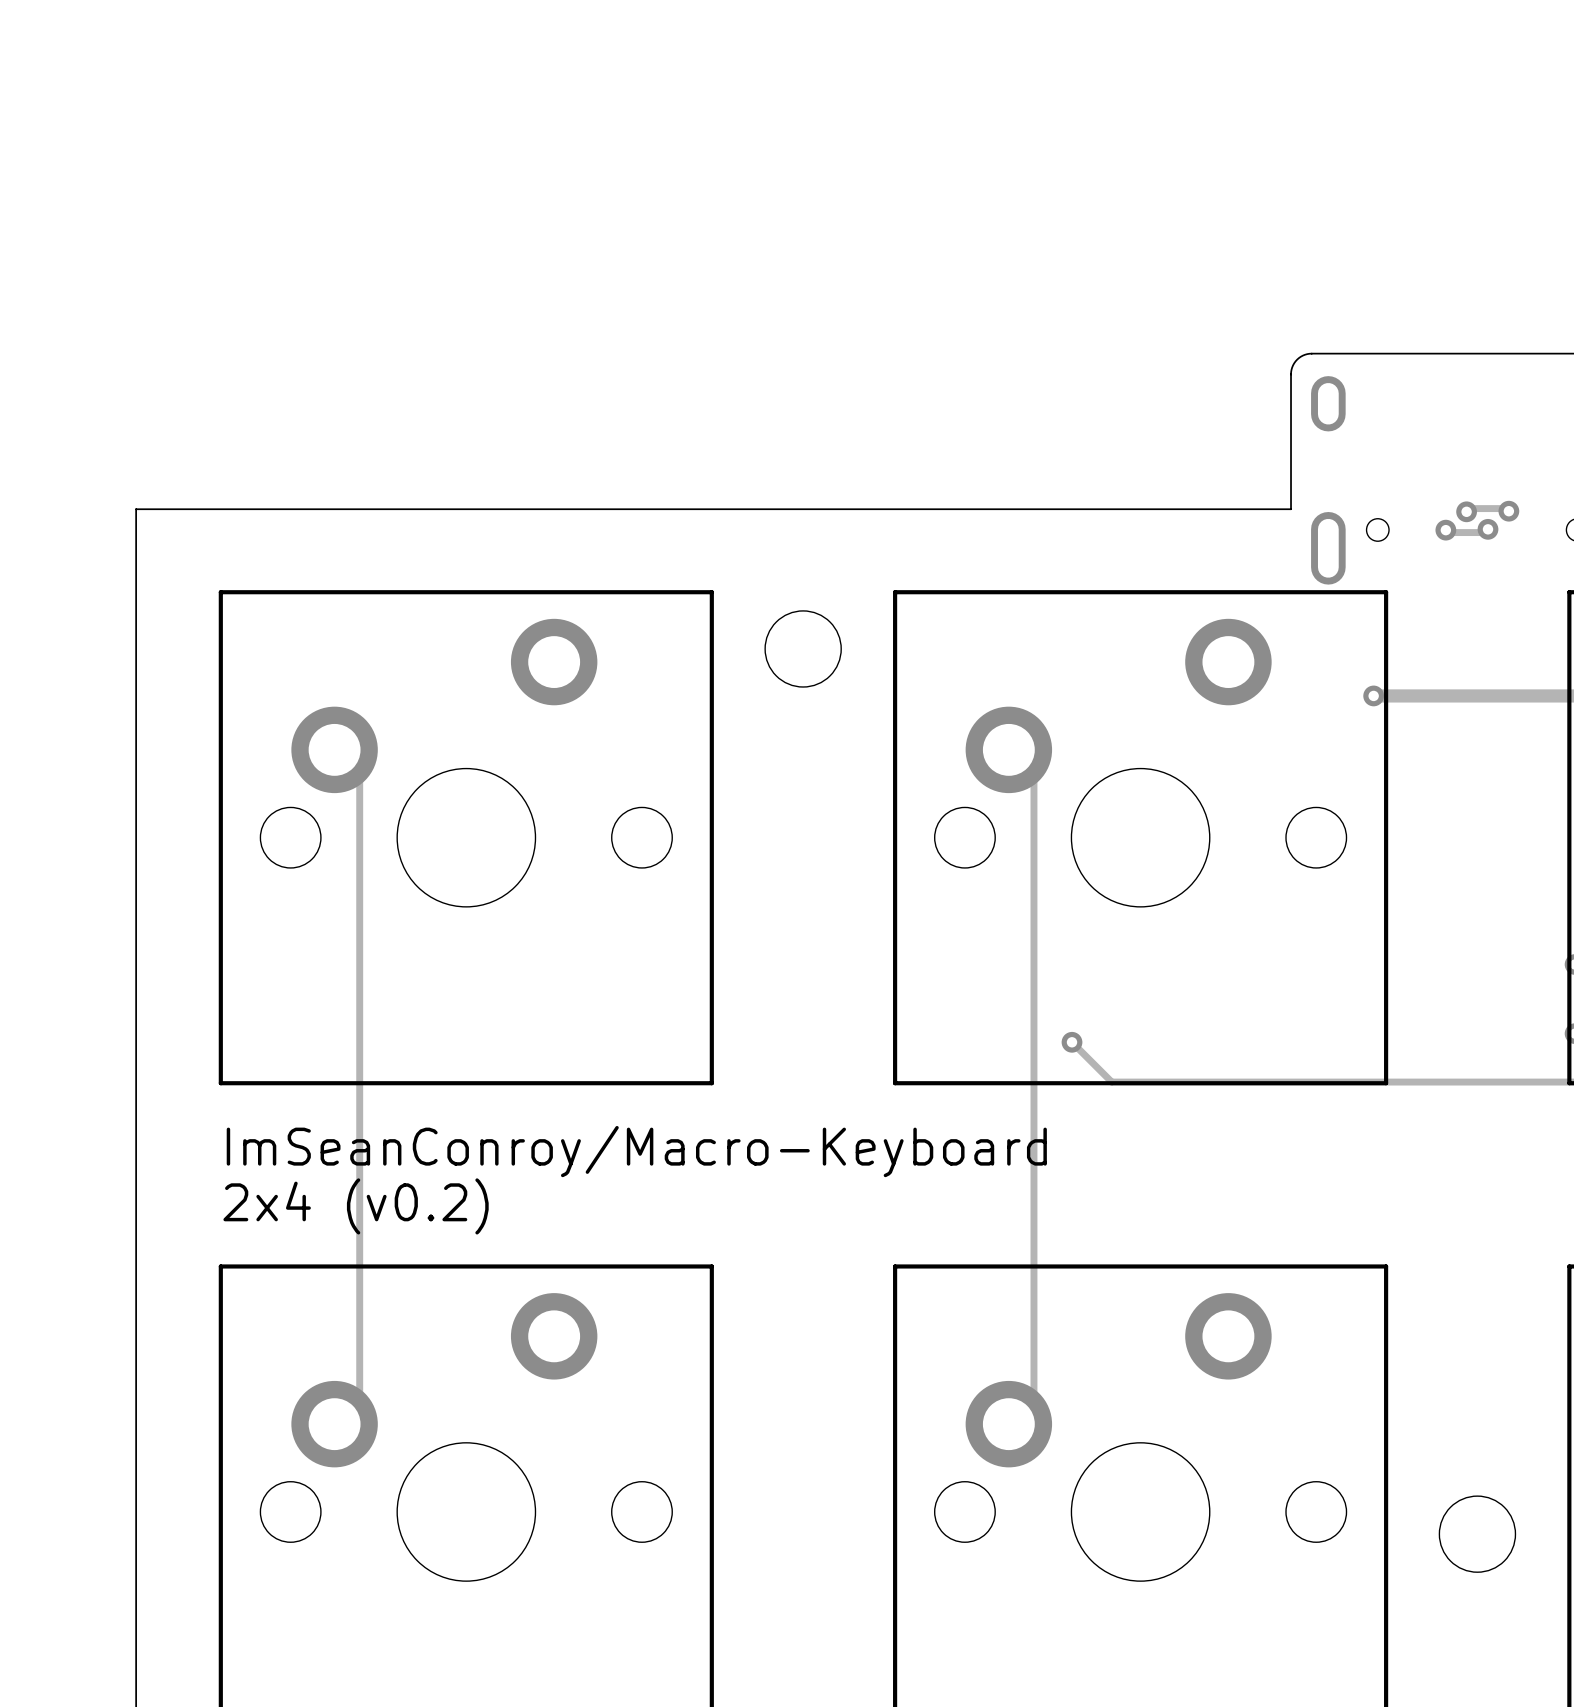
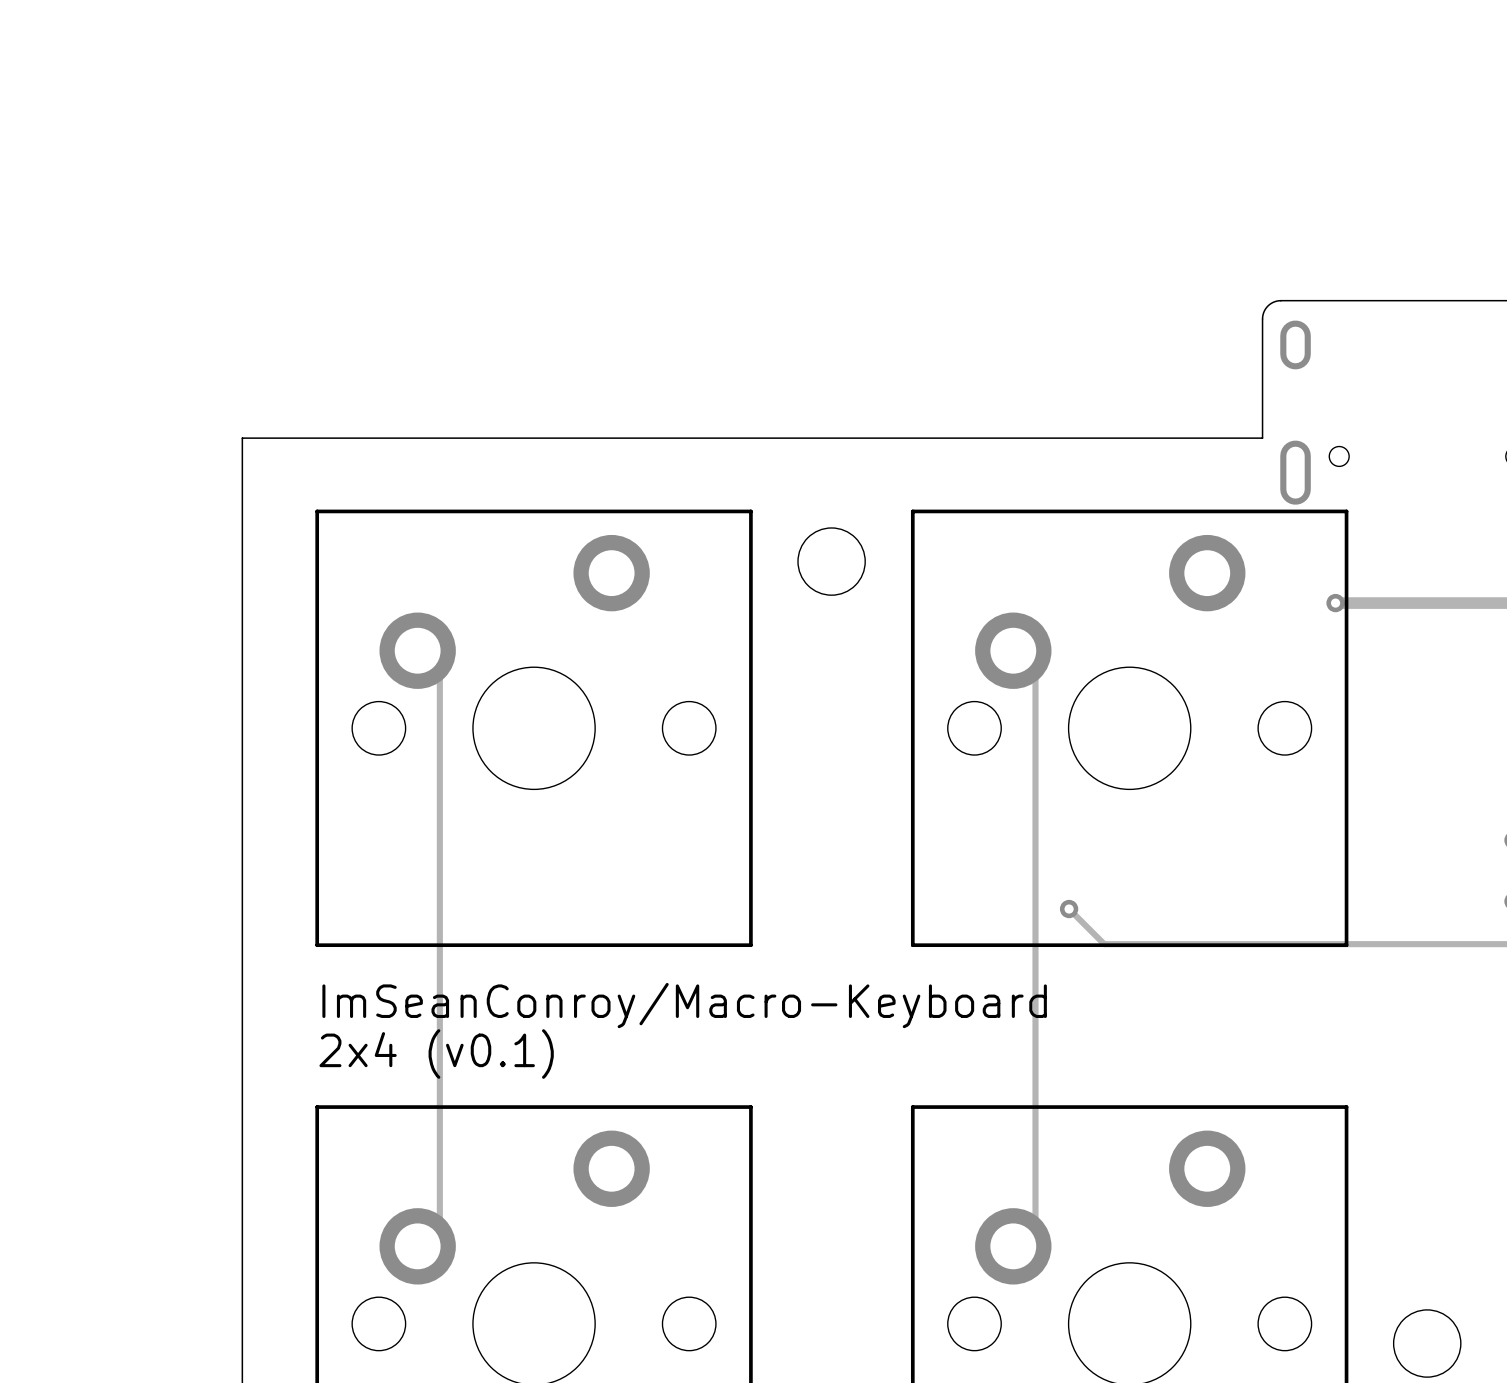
via: (1466, 511) -> none
track: (1508, 511) (1506, 508) (1469, 508) (1466, 511) -> none
via: (1508, 511) -> none
track: (1488, 529) (1484, 532) (1448, 532) (1445, 530) -> none
via: (1488, 529) -> none
via: (1445, 530) -> none
text: 2x4 (v0.2) (356, 1206) -> 2x4 (v0.1) (436, 1054)

